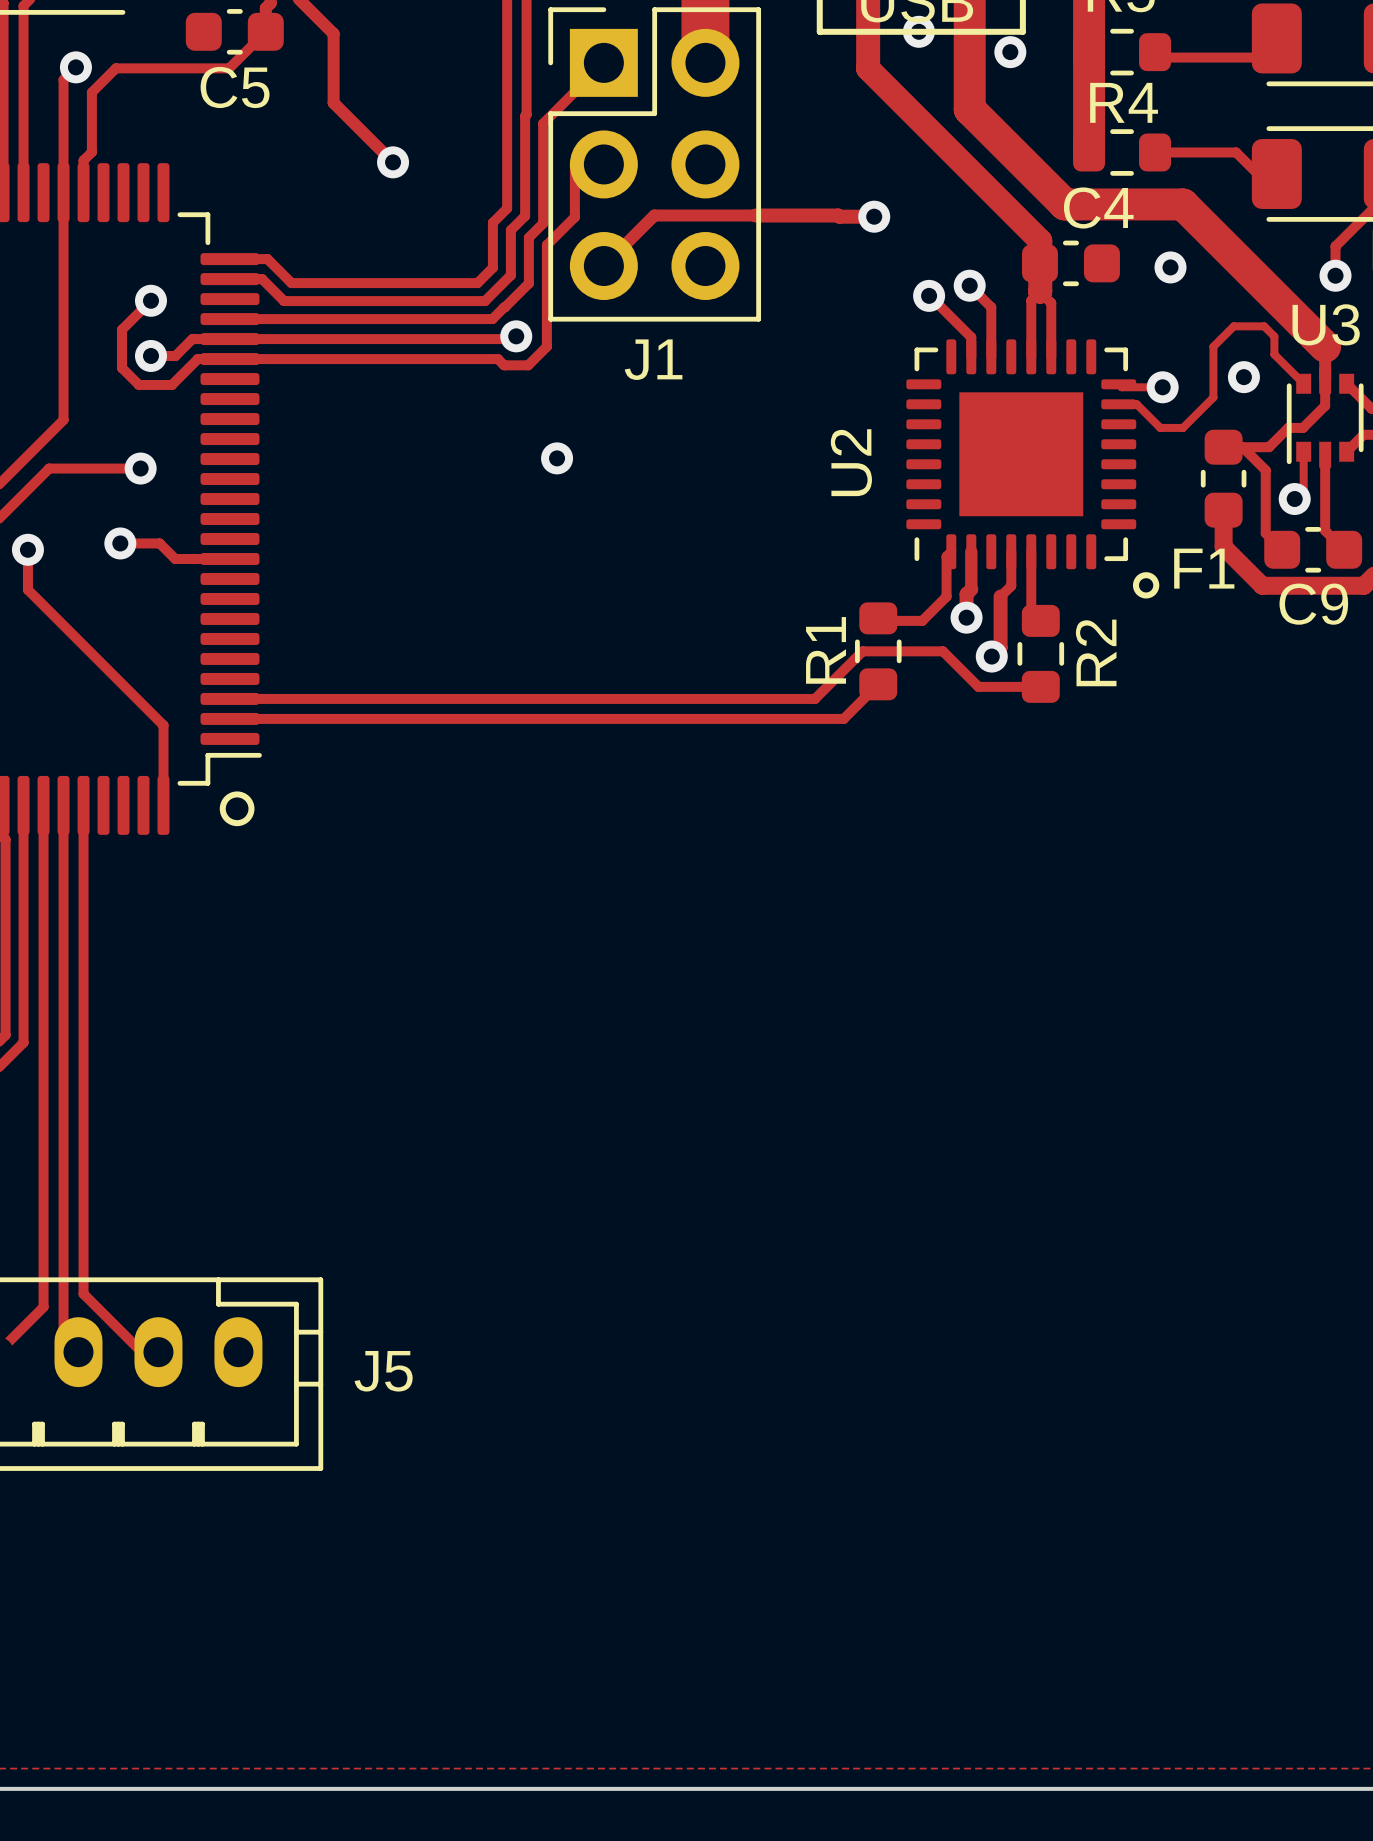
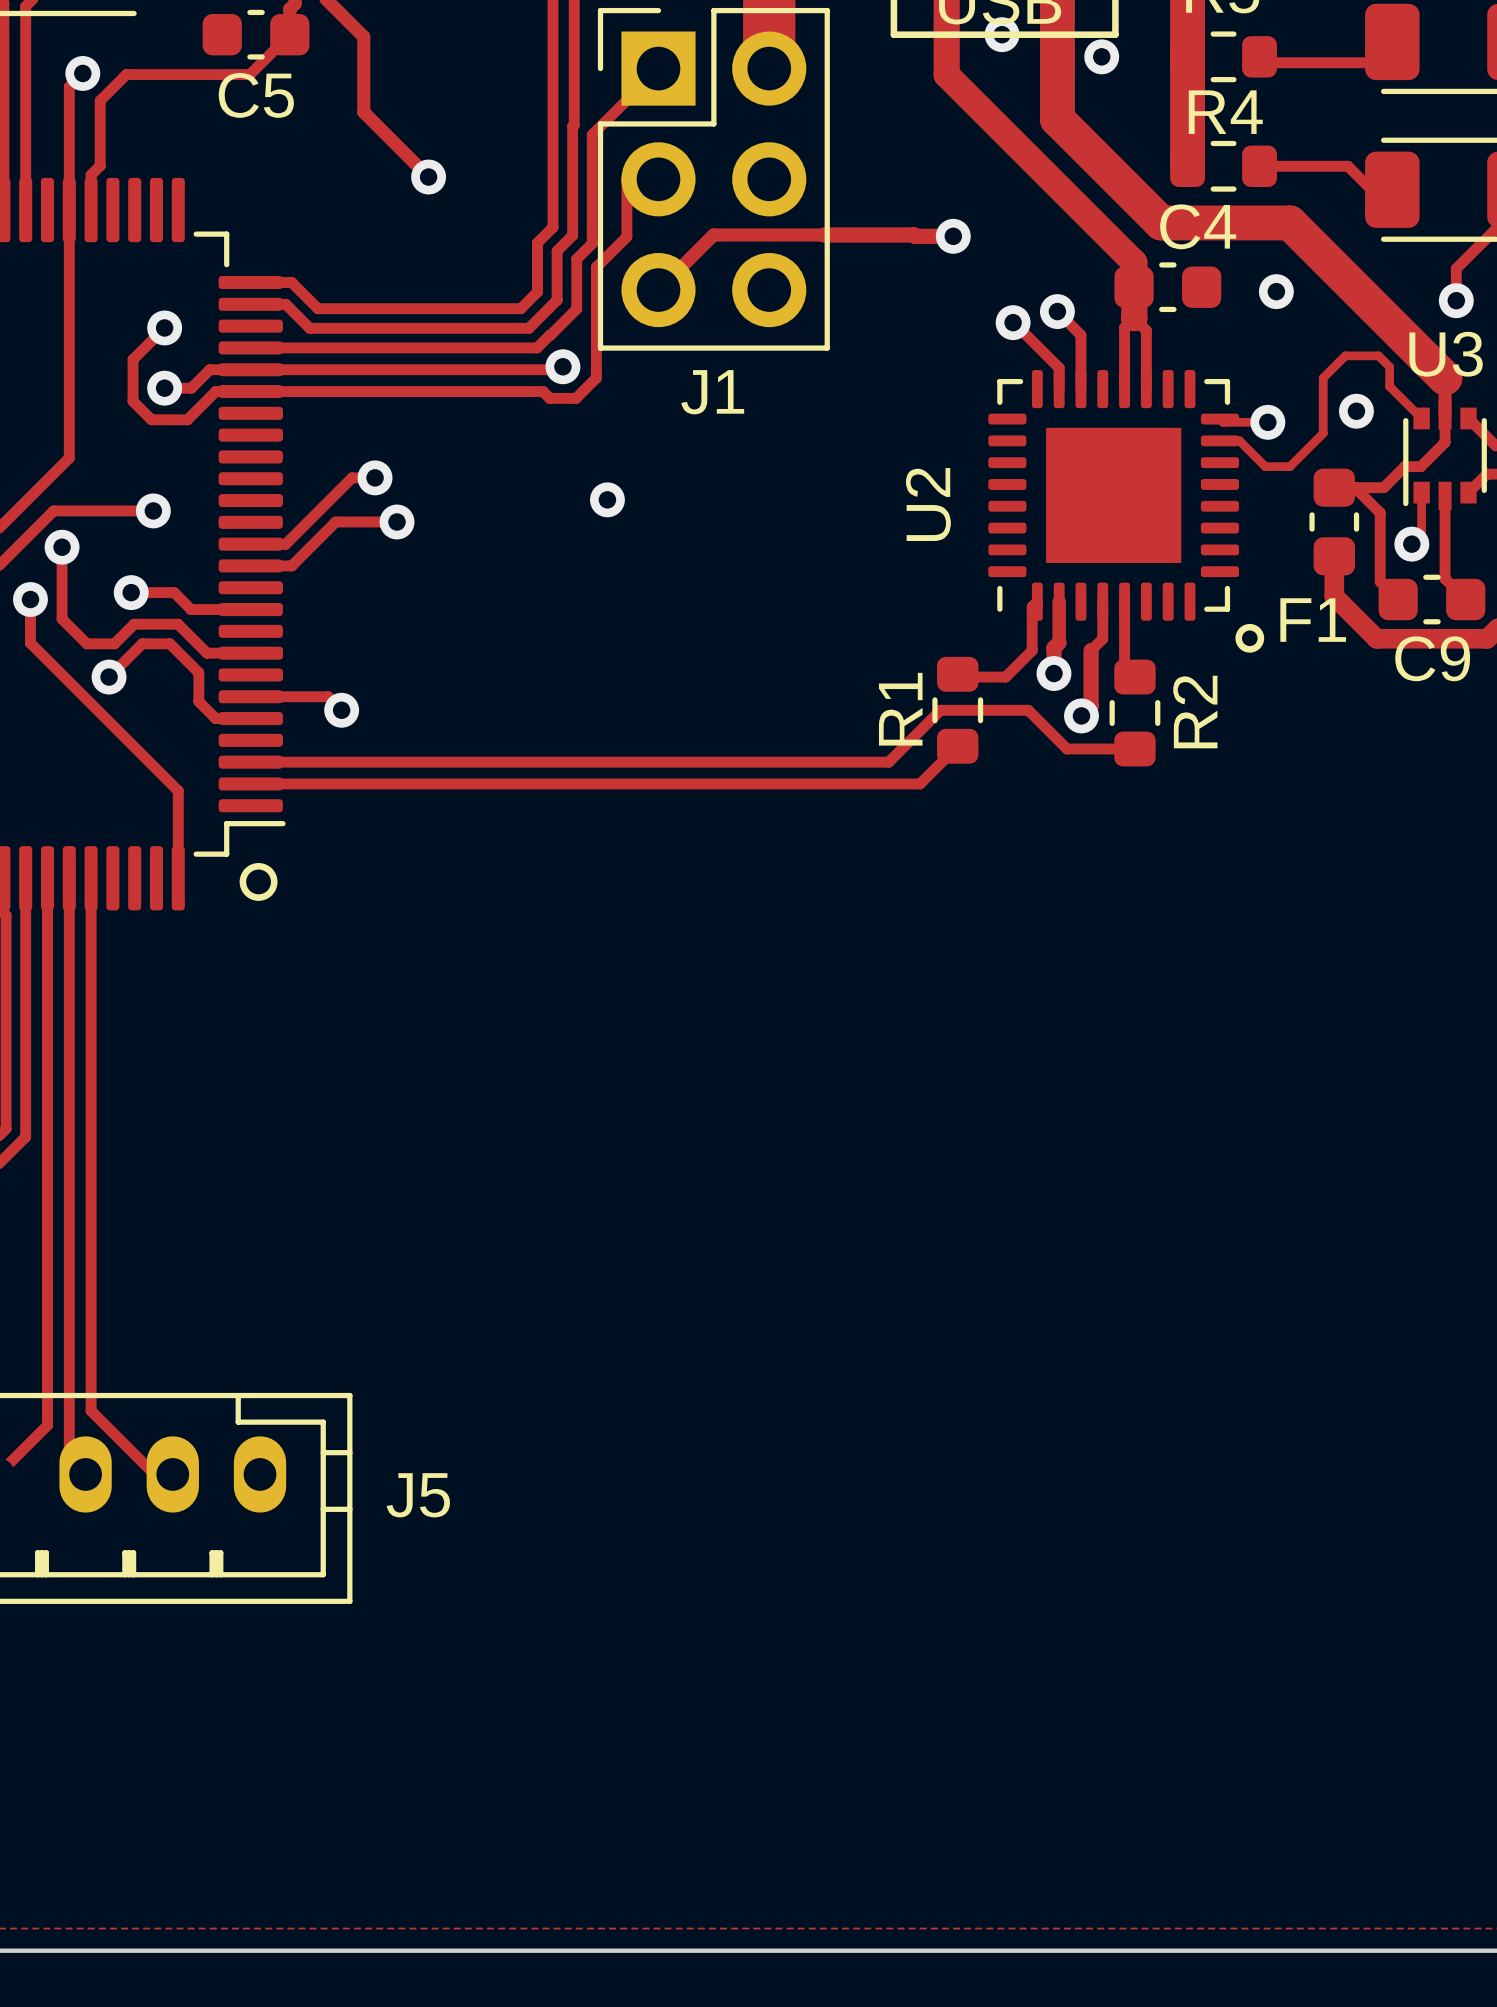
track: none -> (375, 477) (352, 477) (285, 544) (250, 544)
via: none -> (375, 477)
track: none -> (397, 521) (335, 521) (291, 565) (250, 565)
via: none -> (397, 521)
track: none -> (62, 547) (62, 618) (86, 643) (114, 643) (134, 624) (178, 624) (206, 653) (250, 653)
via: none -> (62, 547)
track: none -> (109, 677) (142, 643) (169, 643) (198, 672) (198, 701) (215, 718) (250, 718)
via: none -> (109, 677)
track: none -> (250, 696) (328, 696) (341, 710)
via: none -> (341, 710)

